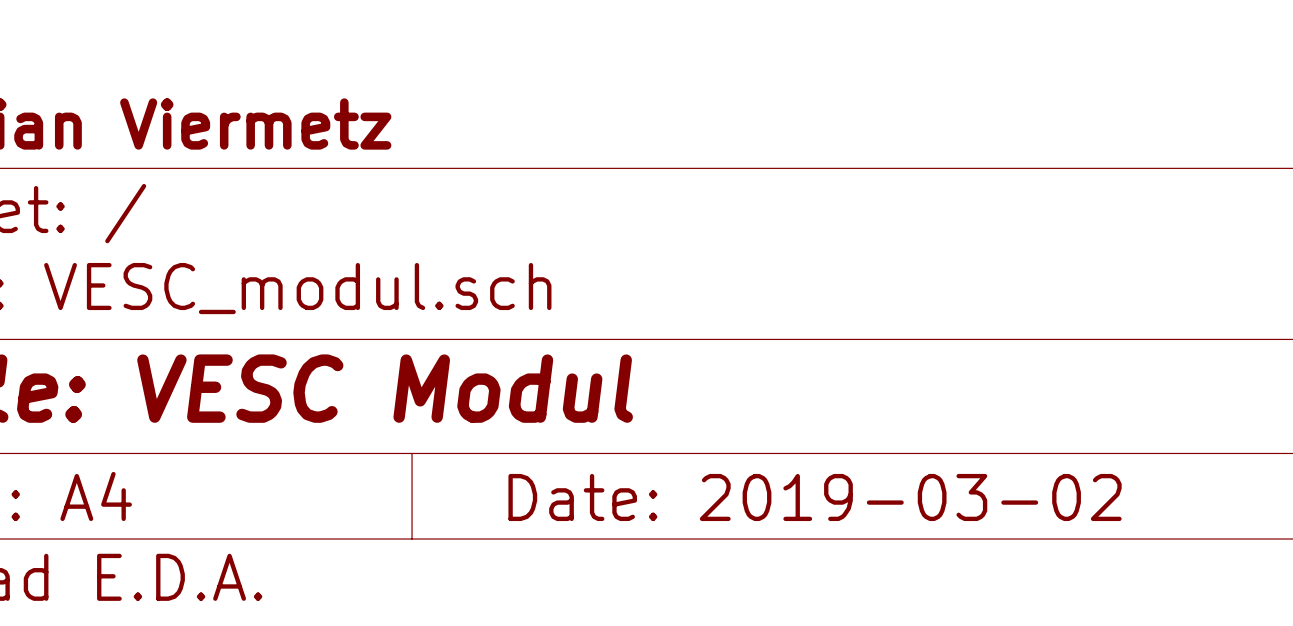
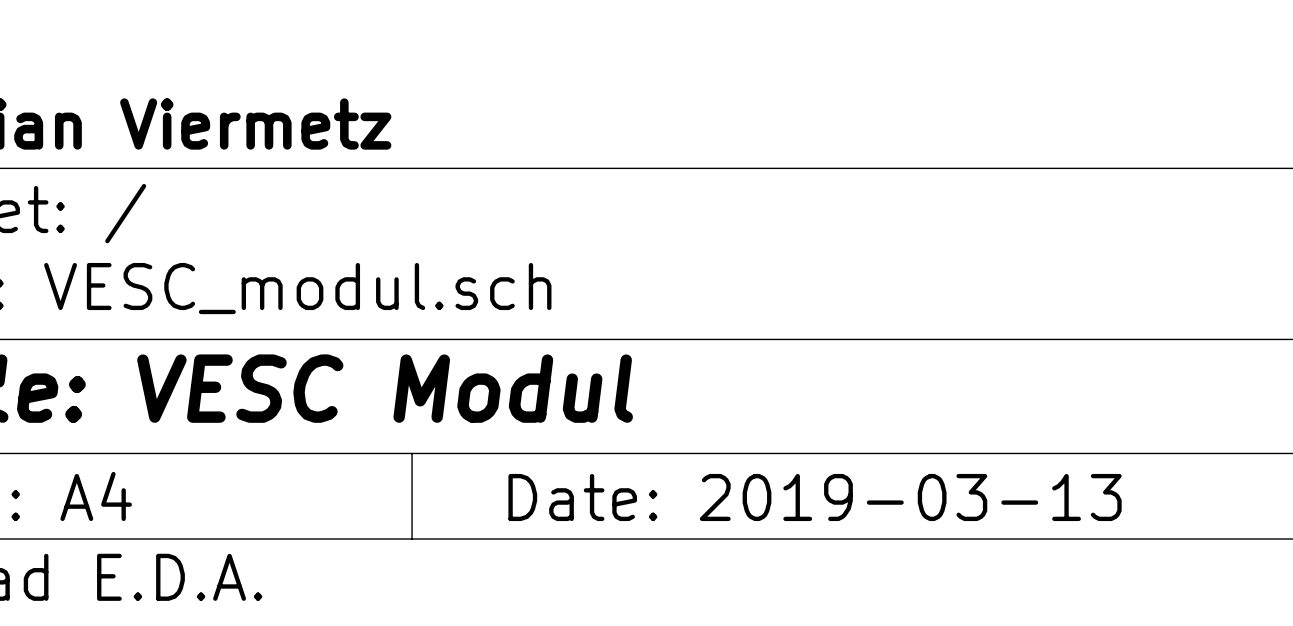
title block: Date: 2019-03-02 (815, 497) -> Date: 2019-03-13 (815, 497)

